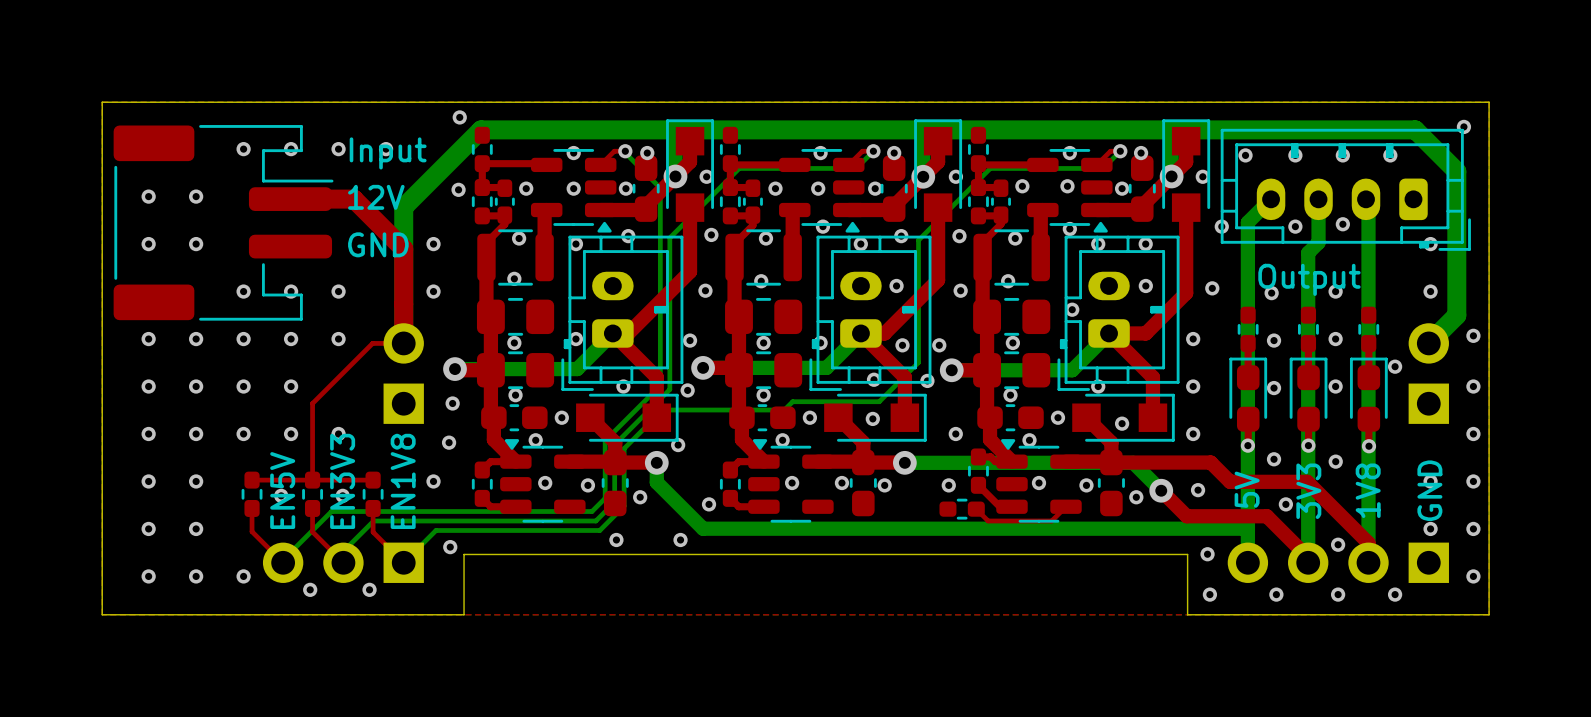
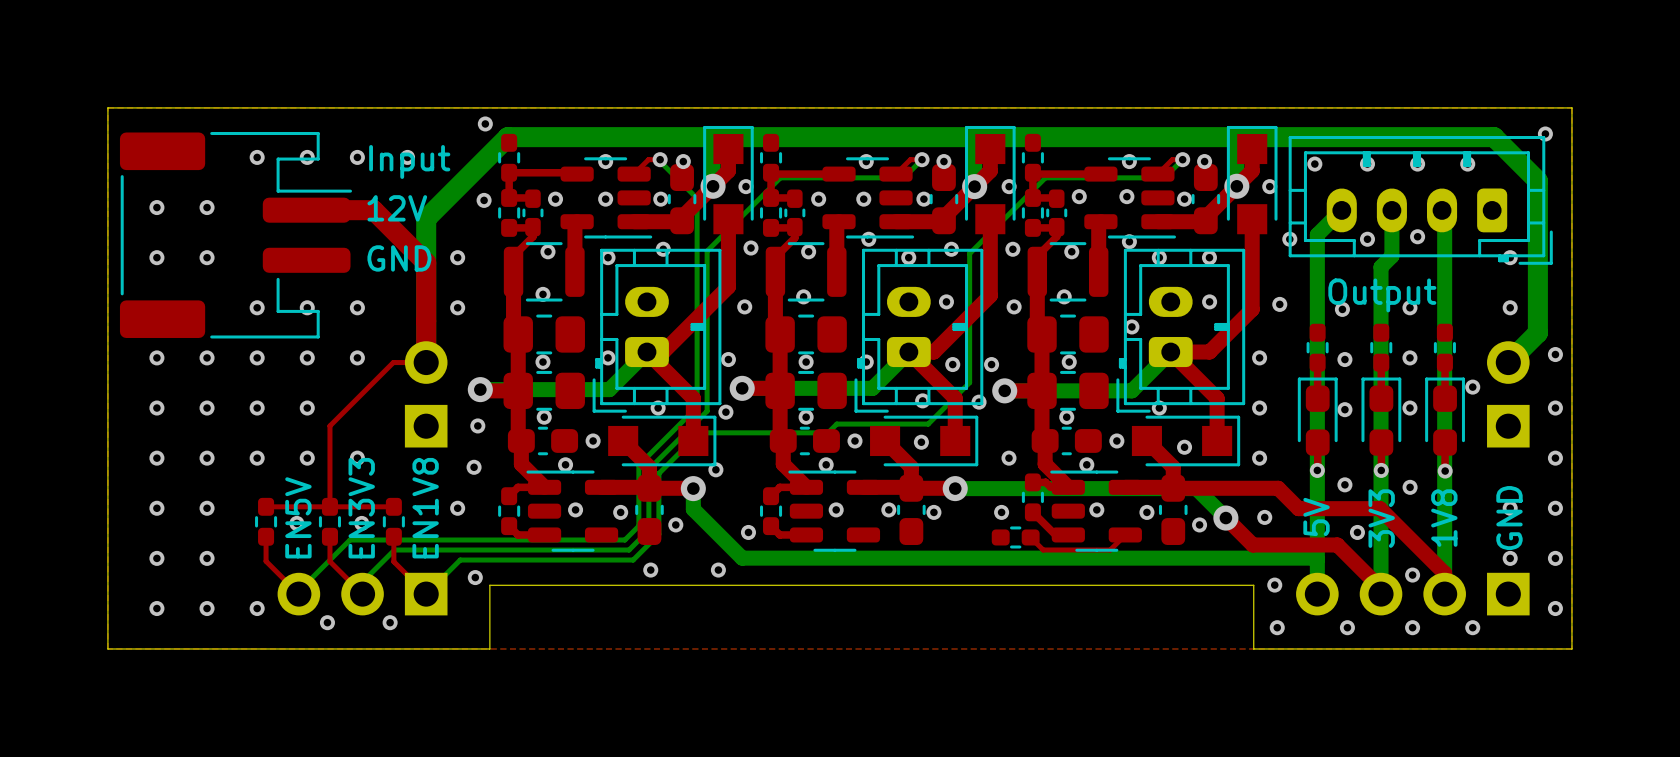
part footprint: [530, 149, 617, 233] -> [560, 157, 653, 239]
part footprint: [779, 149, 865, 233] -> [822, 157, 915, 239]
part footprint: [1027, 149, 1113, 233] -> [1084, 157, 1177, 239]
part footprint: [500, 439, 586, 523] -> [526, 470, 619, 552]
part footprint: [748, 439, 834, 523] -> [788, 470, 881, 552]
part footprint: [996, 439, 1082, 523] -> [1050, 470, 1142, 552]

